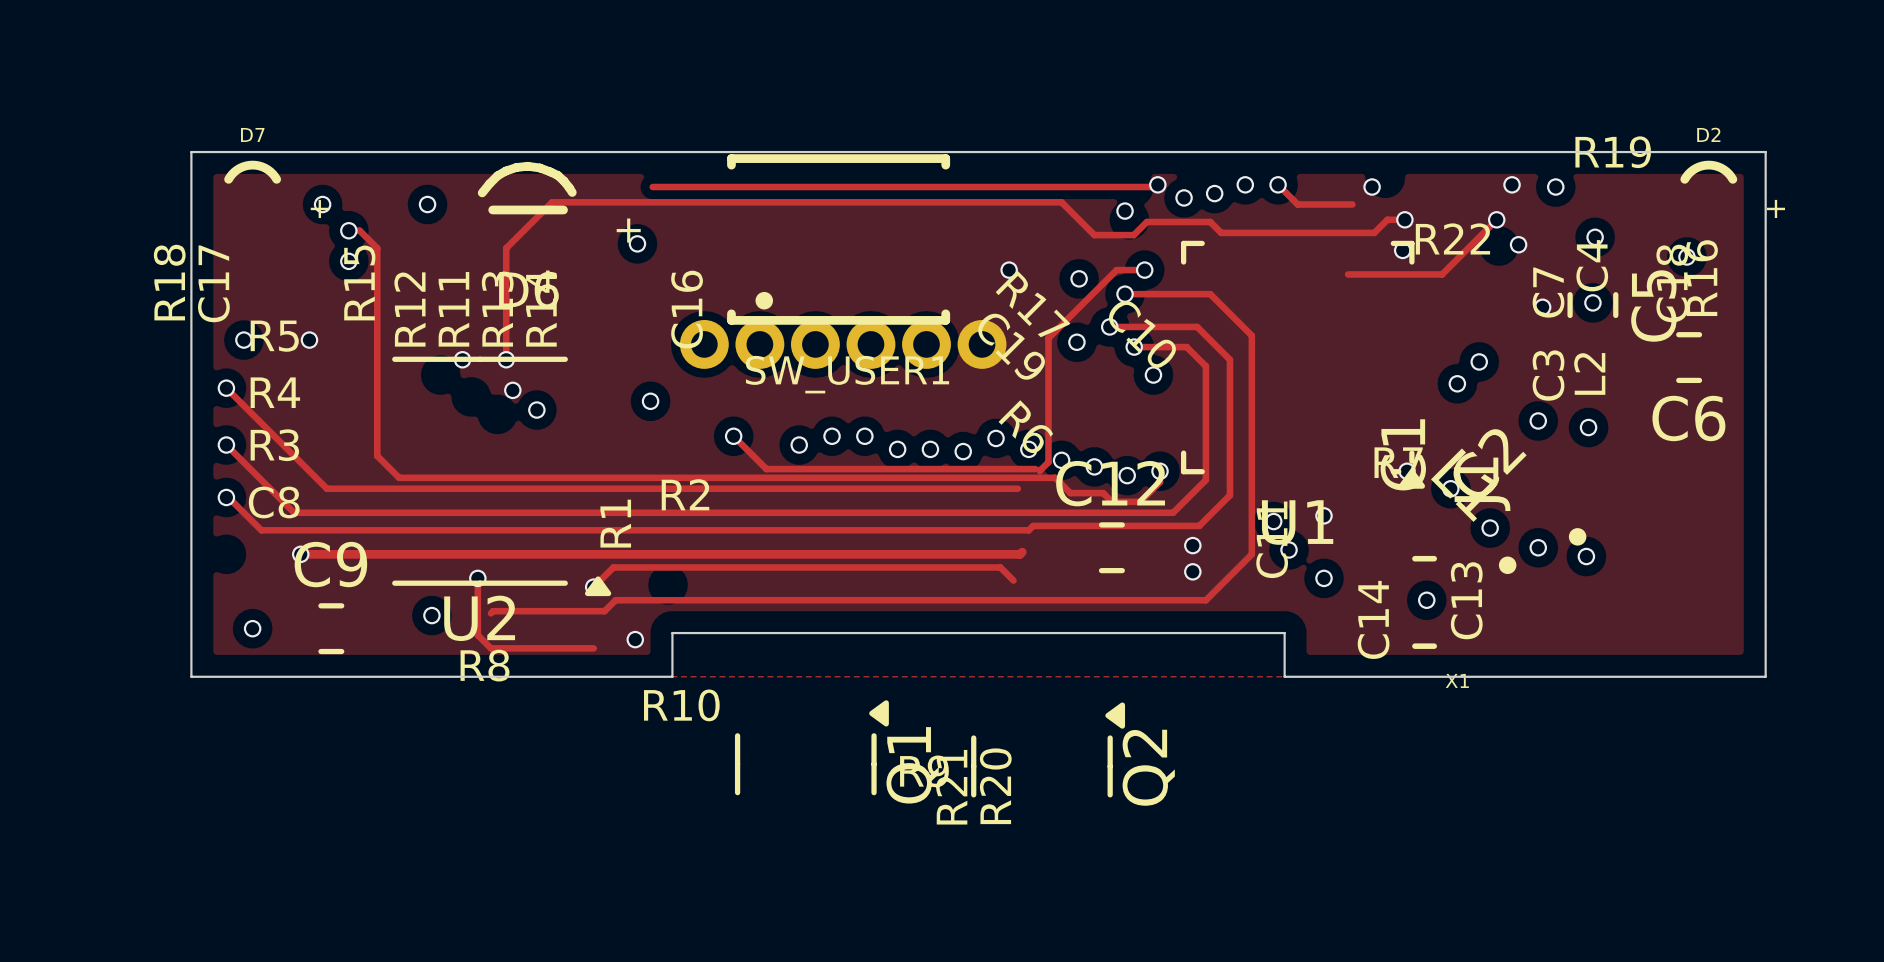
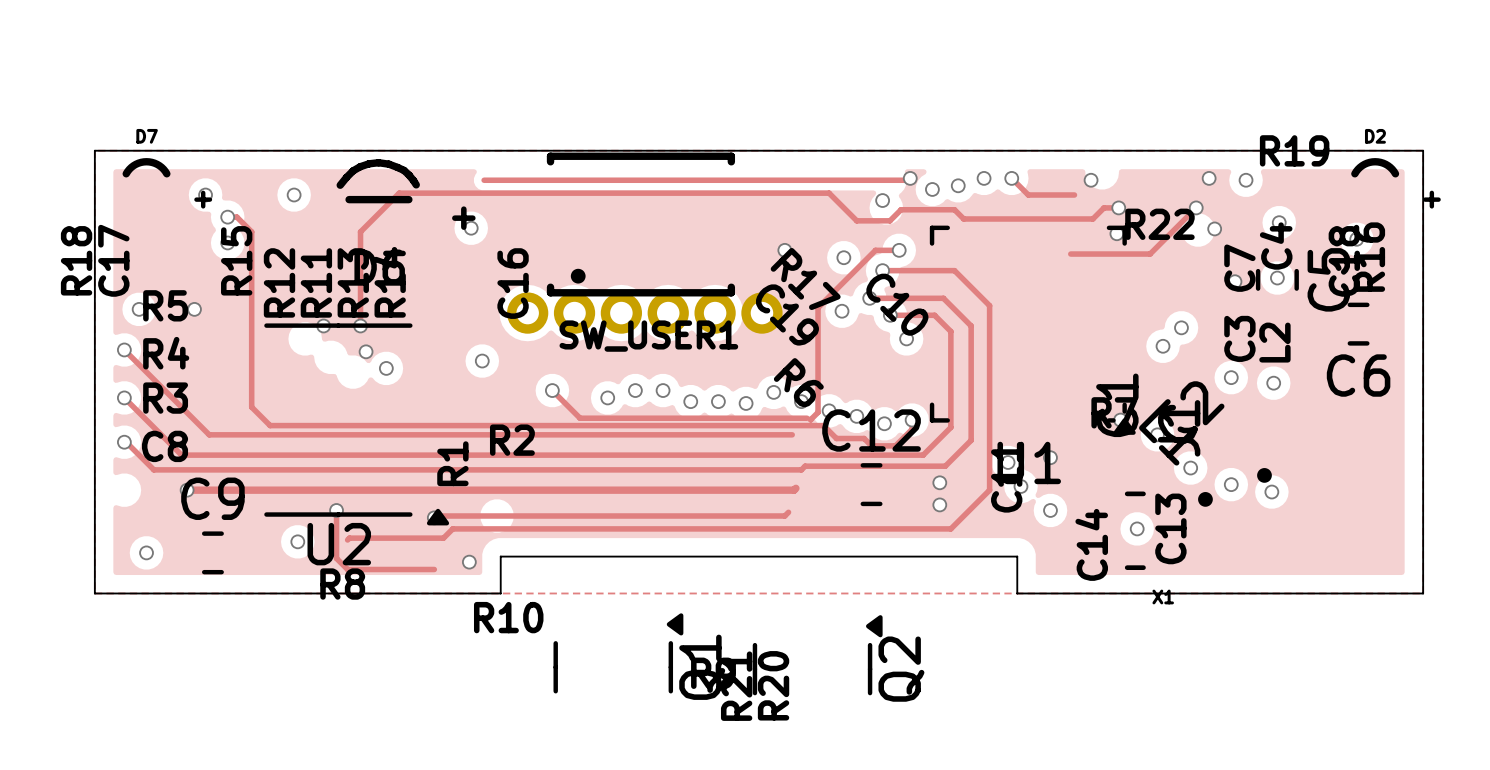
track: (1013, 580) (1000, 567) (613, 567) (595, 584) -> (788, 512) (784, 516) (436, 516)

